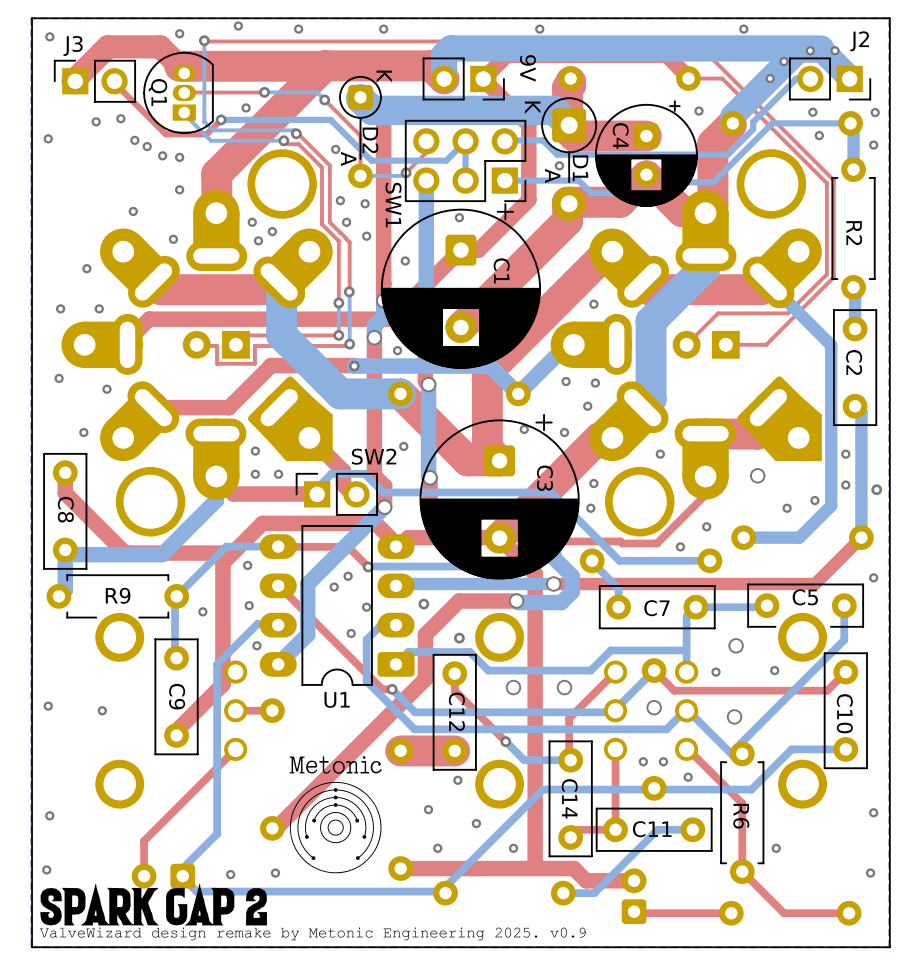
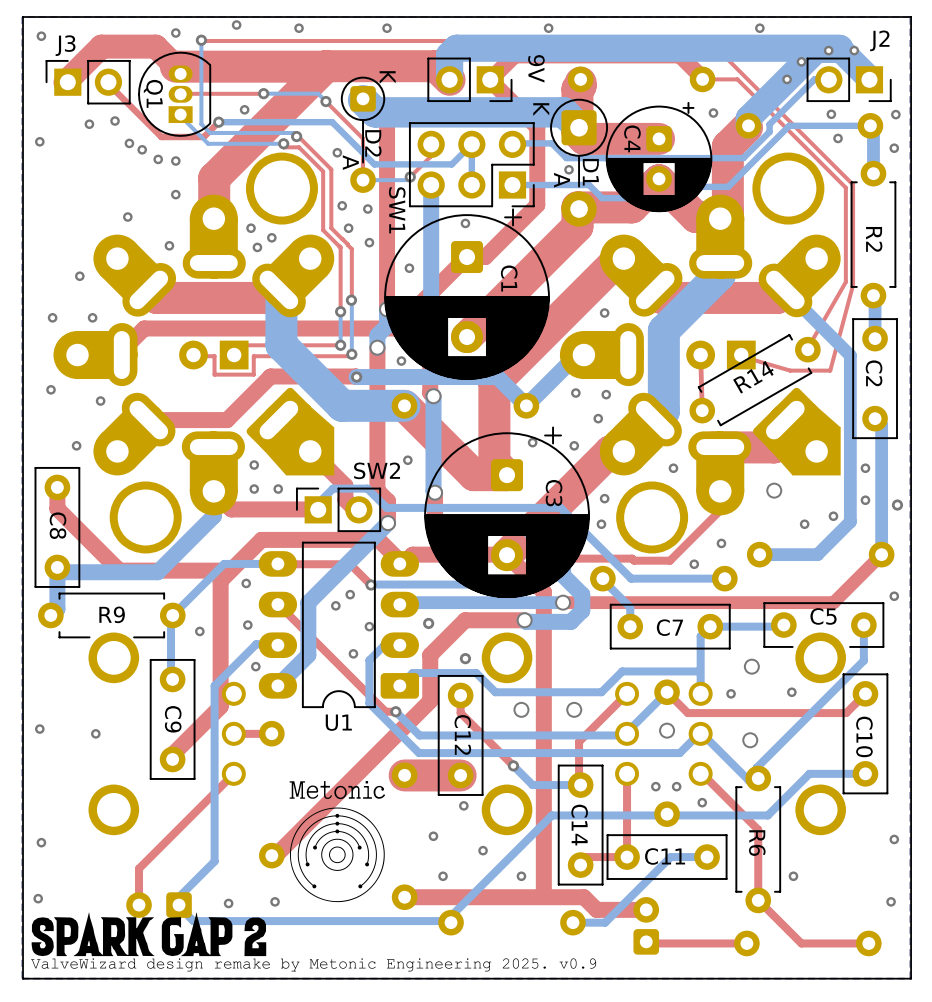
top track: (826, 274) (787, 313) (718, 313) (686, 344) -> (845, 282) (807, 348)
top track: (833, 277) (766, 344) (725, 344) -> (853, 285) (830, 370) (790, 370) (740, 356)
top track: none -> (700, 354) (702, 410)
R14: none -> (755, 380)

